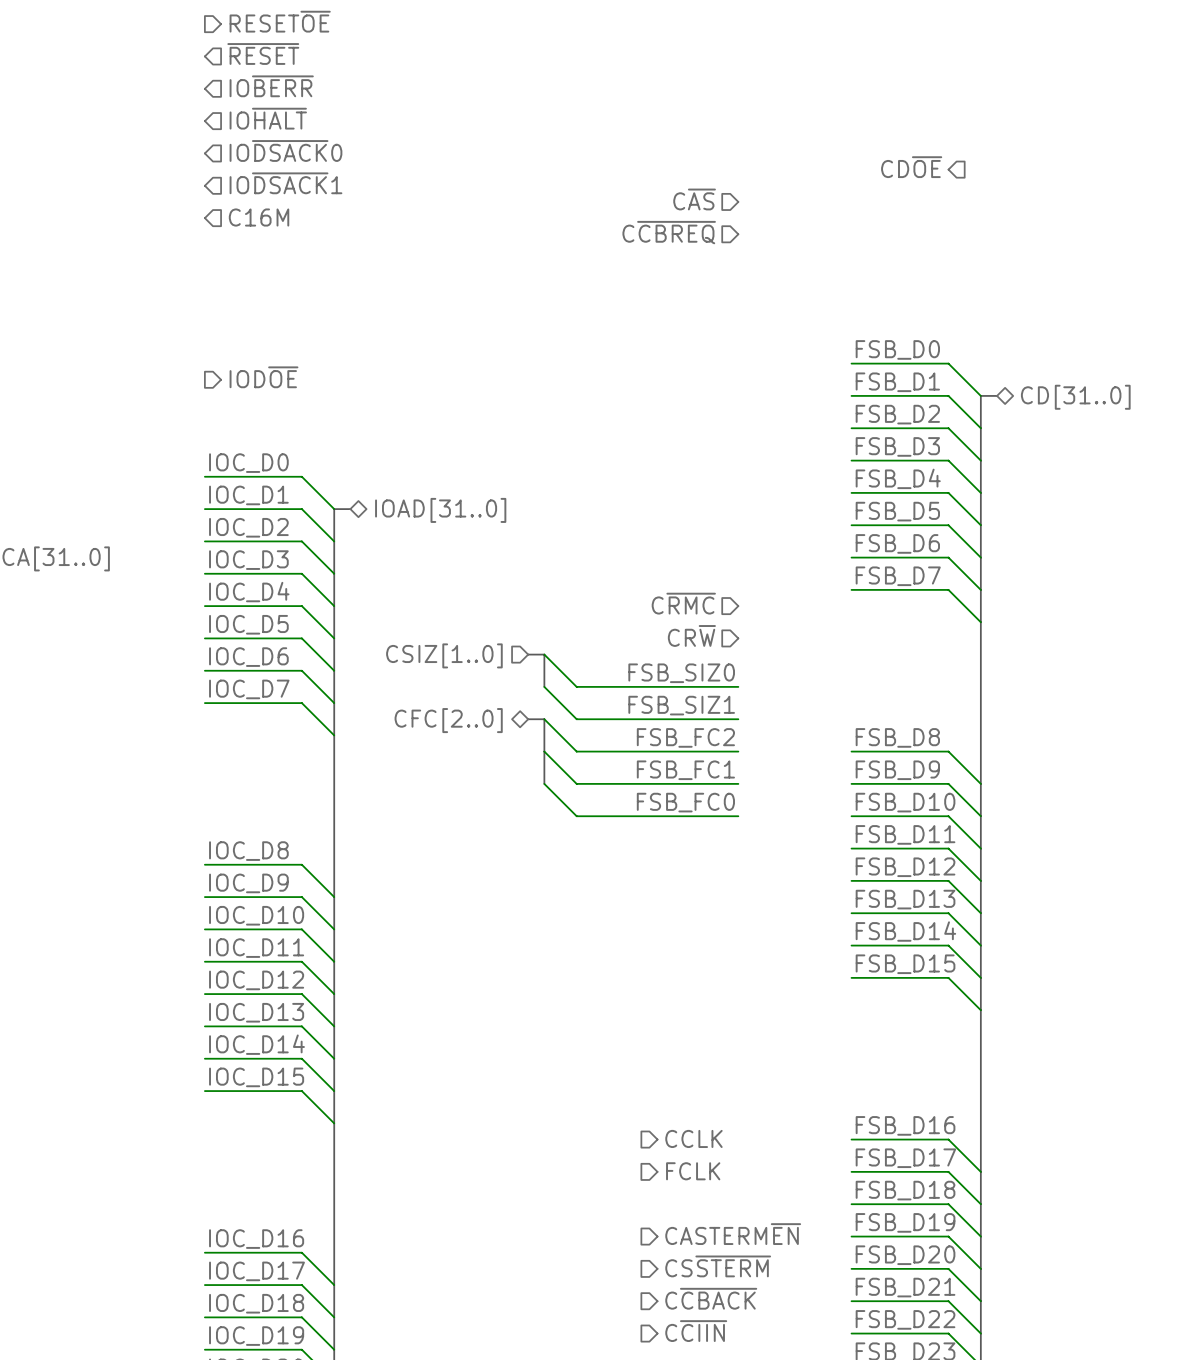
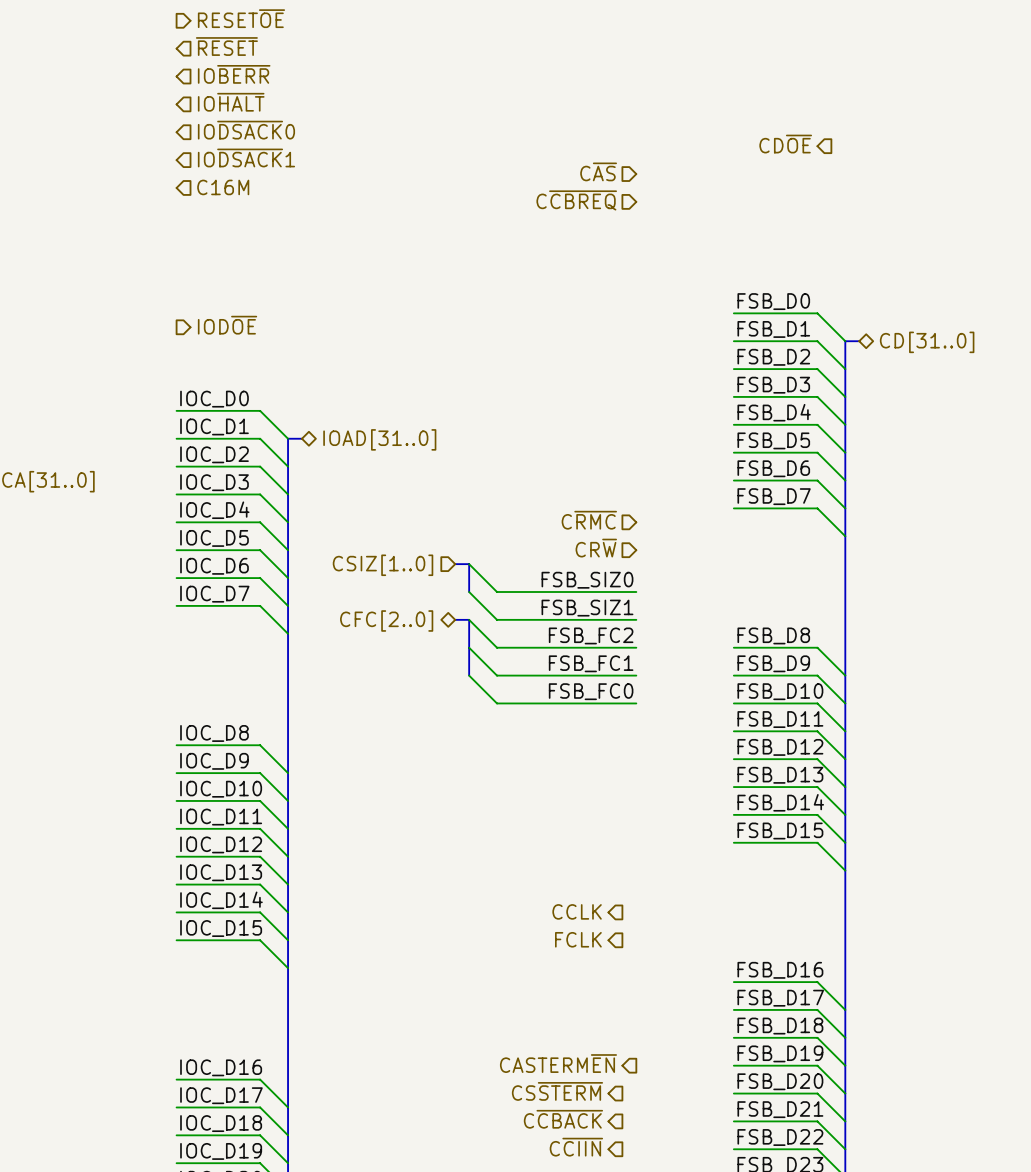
hierarchical label rotation: 0° (693, 1138) -> 180° (577, 911)
hierarchical label position: CCLK (693, 1138) -> CCLK (577, 911)
hierarchical label rotation: 0° (693, 1171) -> 180° (578, 939)
hierarchical label position: FCLK (693, 1171) -> FCLK (578, 939)
hierarchical label rotation: 0° (733, 1234) -> 180° (558, 1063)
hierarchical label rotation: 0° (718, 1266) -> 180° (557, 1091)
hierarchical label rotation: 0° (711, 1298) -> 180° (563, 1119)
hierarchical label rotation: 0° (696, 1331) -> 180° (576, 1147)

